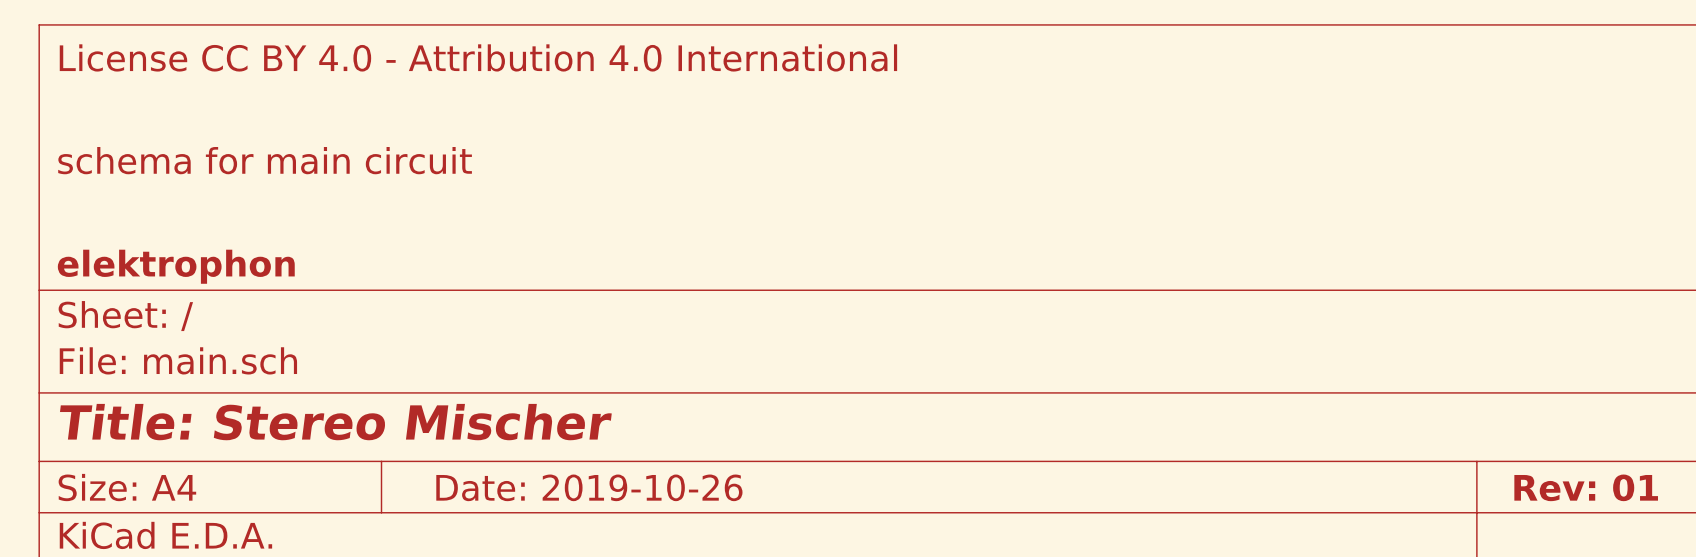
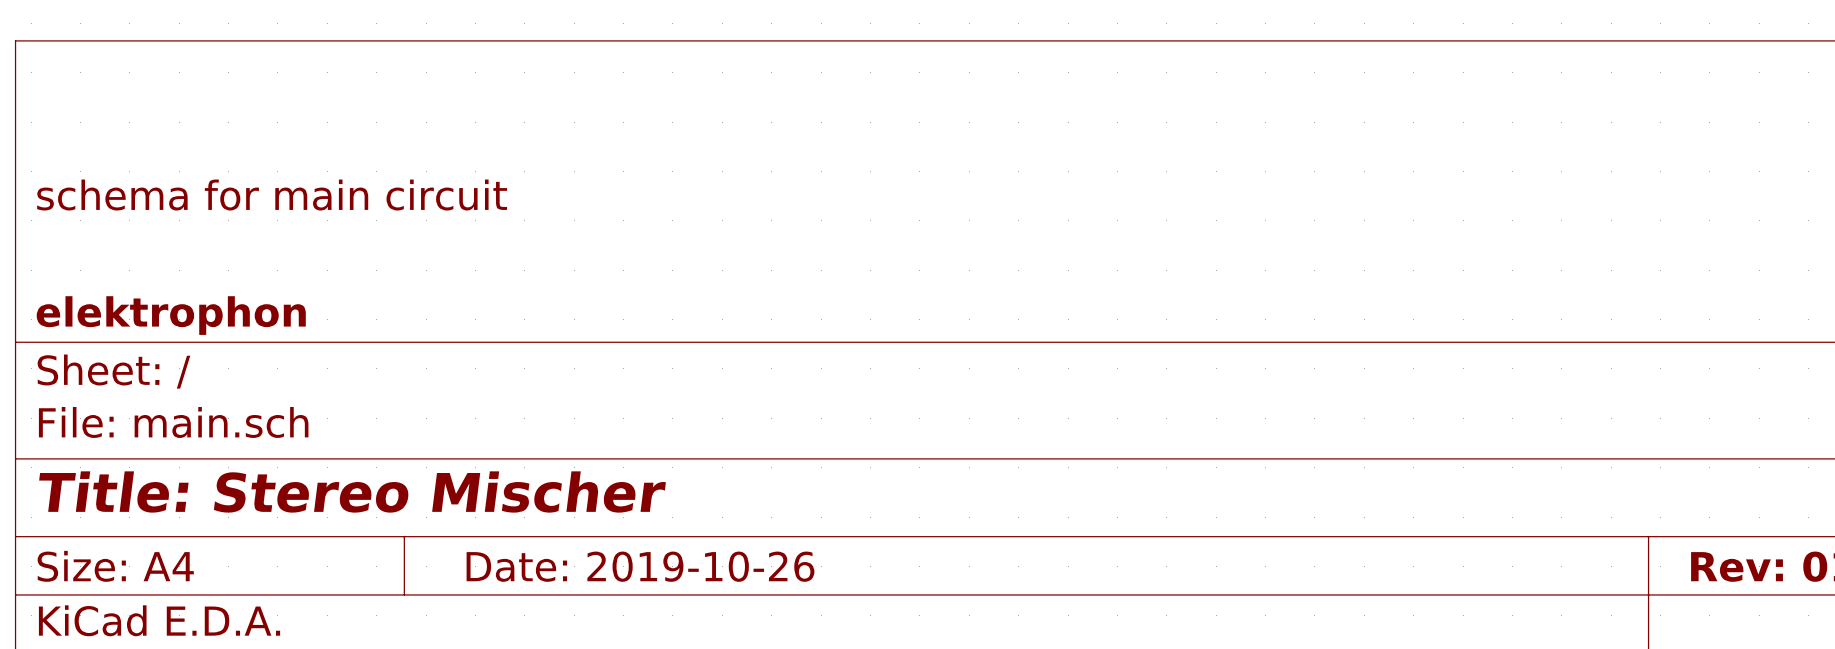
title block: License CC BY 4.0 - Attribution 4.0 International (478, 57) -> none

